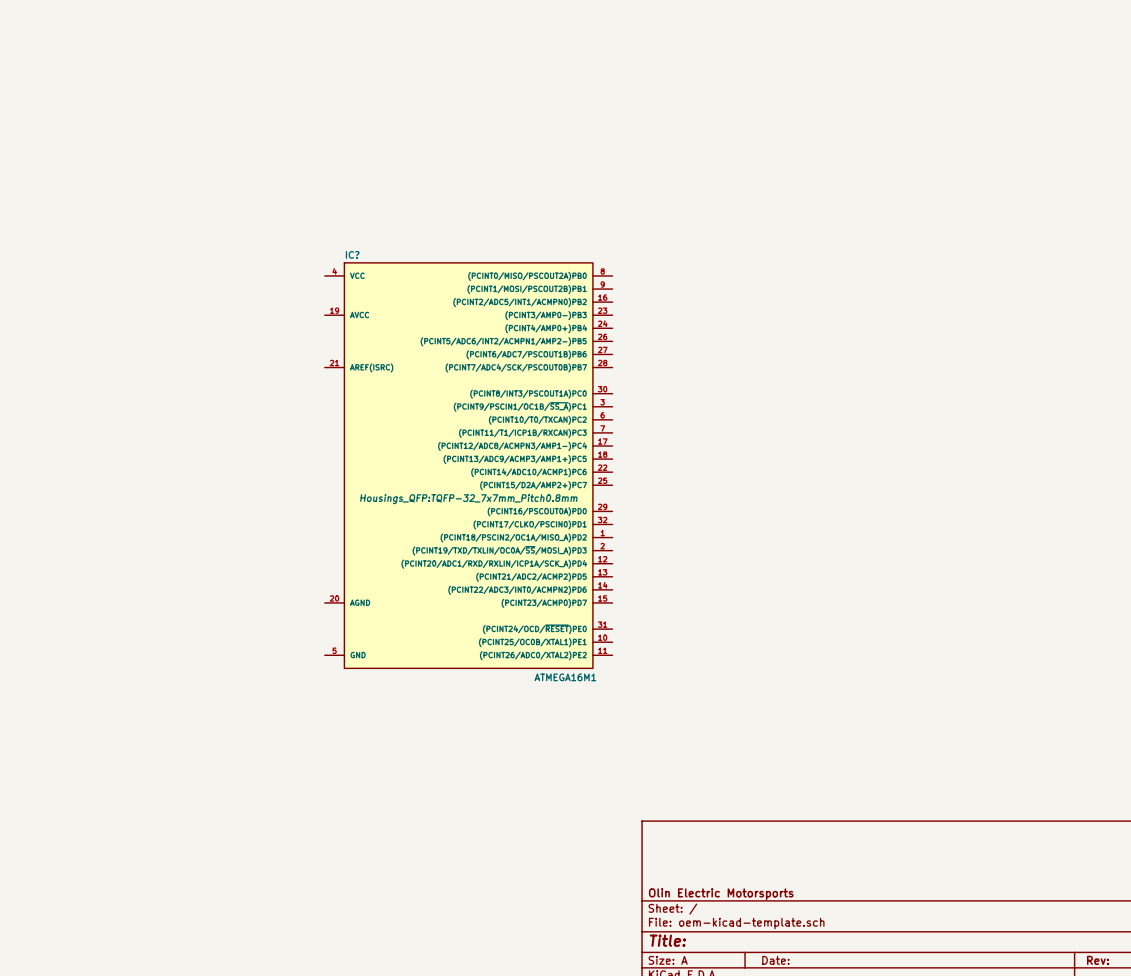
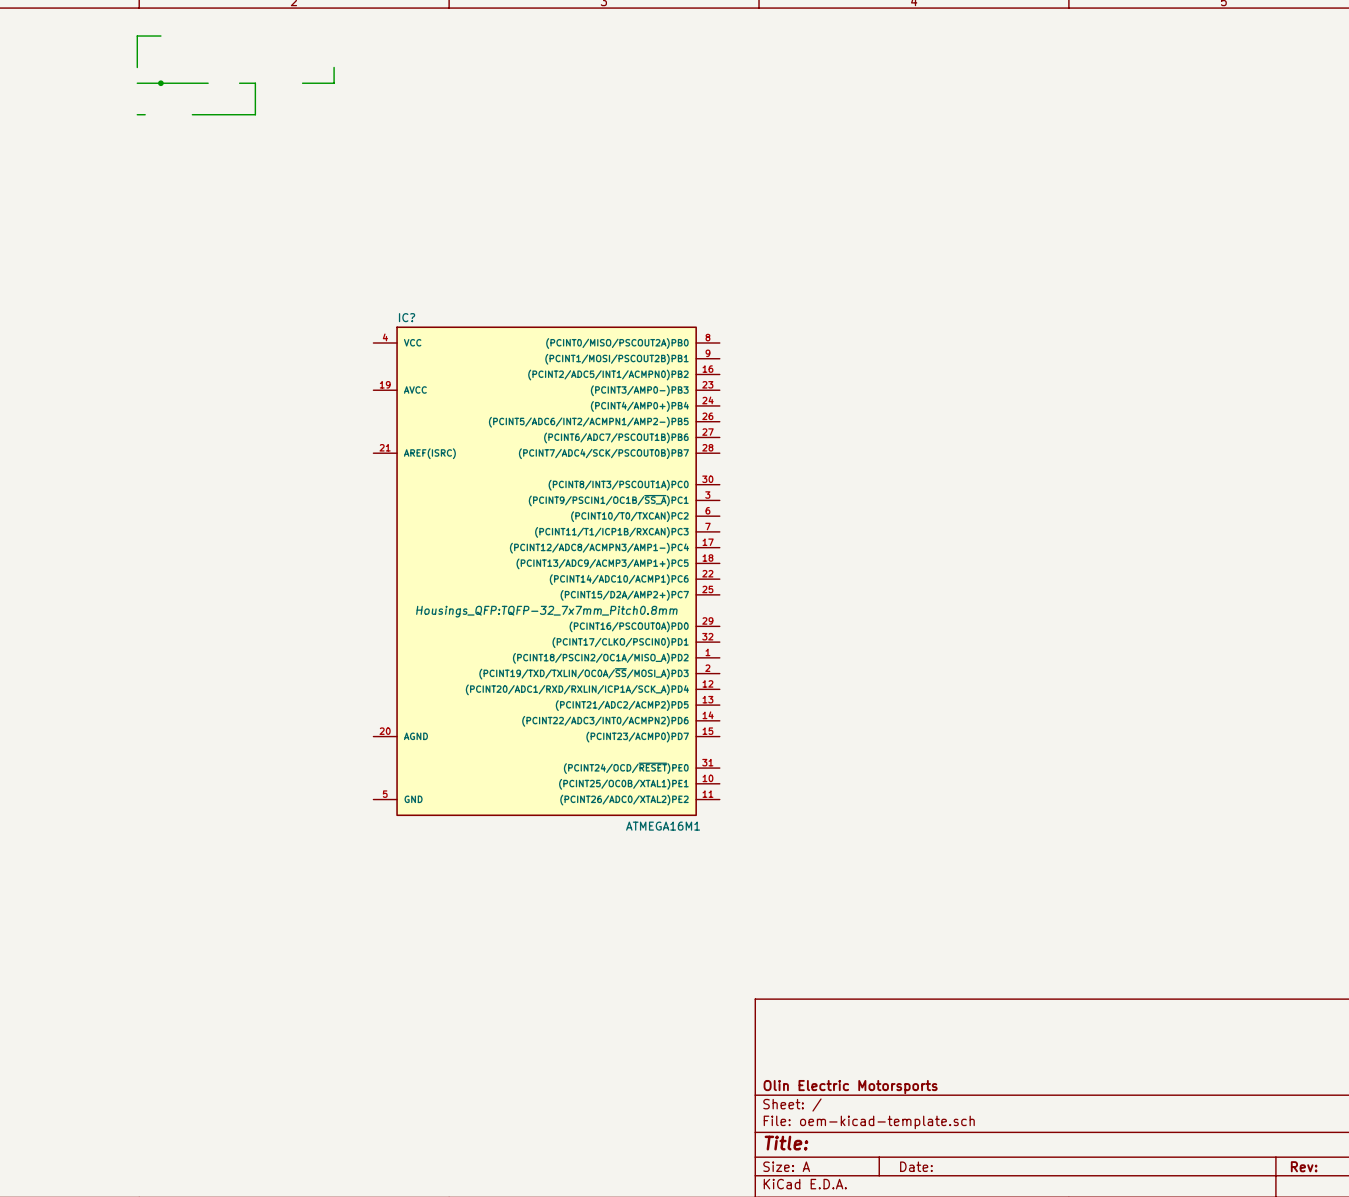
wire: none -> (160, 36) (137, 36) (137, 67)
wire: none -> (334, 67) (334, 83) (302, 83)
wire: none -> (137, 83) (208, 83)
junction: none -> (160, 83)
wire: none -> (239, 83) (255, 83) (255, 114) (192, 114)
wire: none -> (137, 114) (145, 114)

